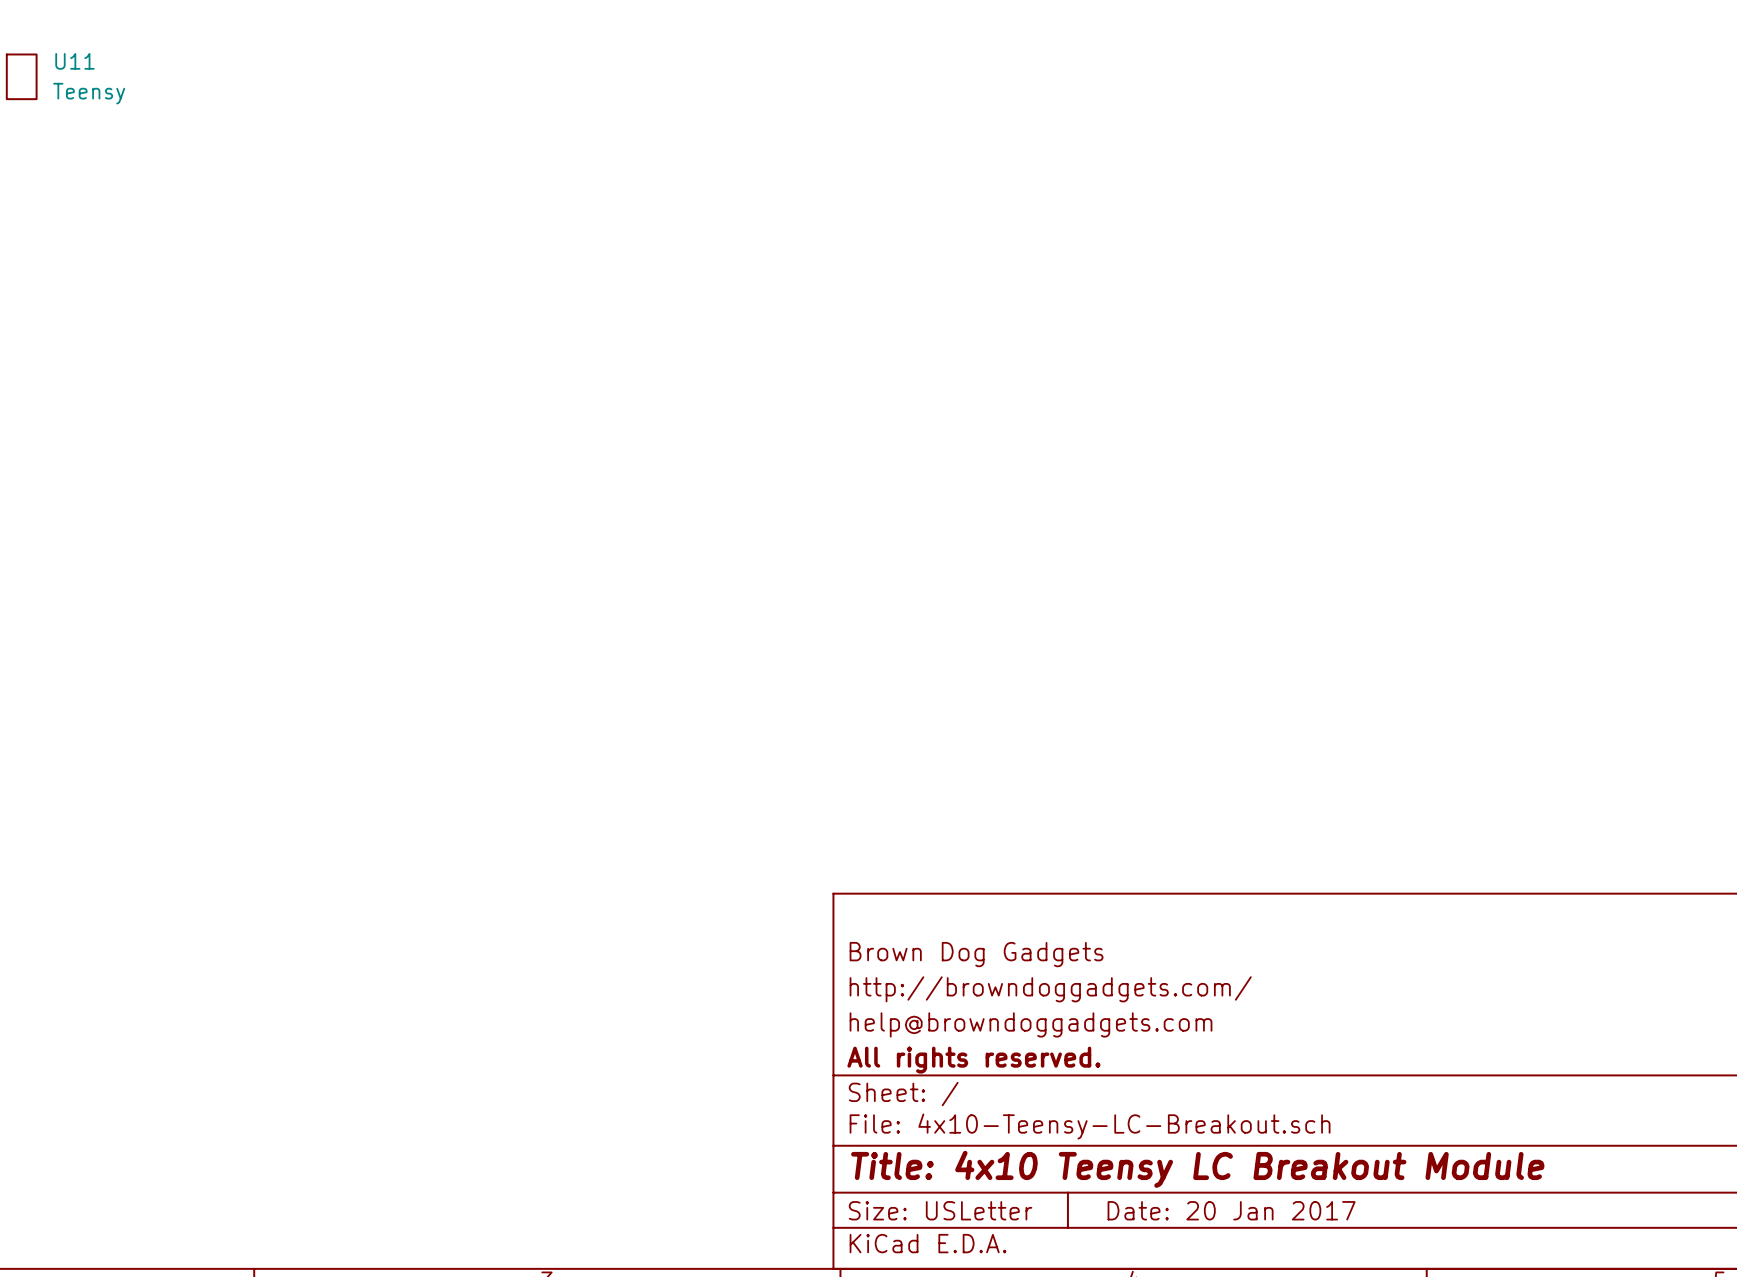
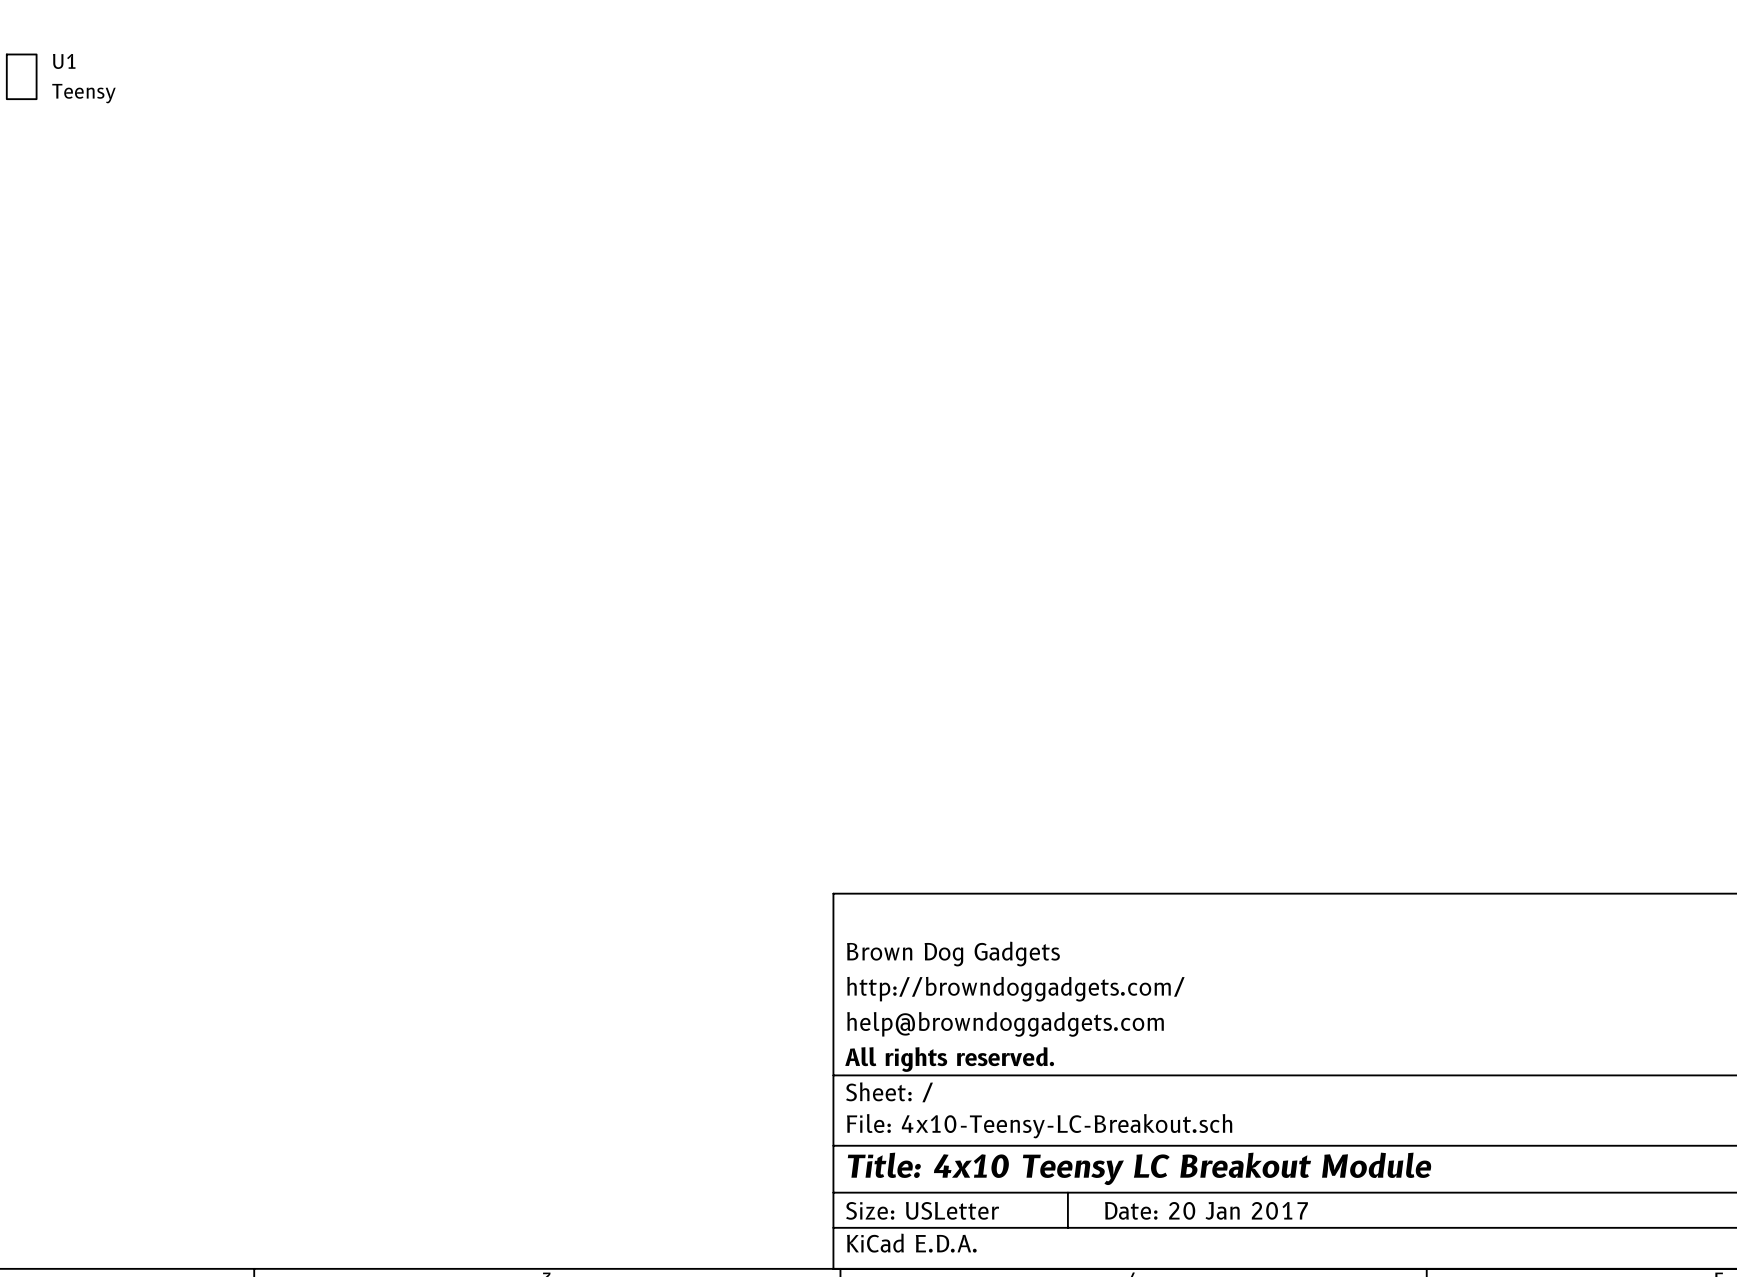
U11 name: U11 (74, 61) -> U1 (64, 61)

